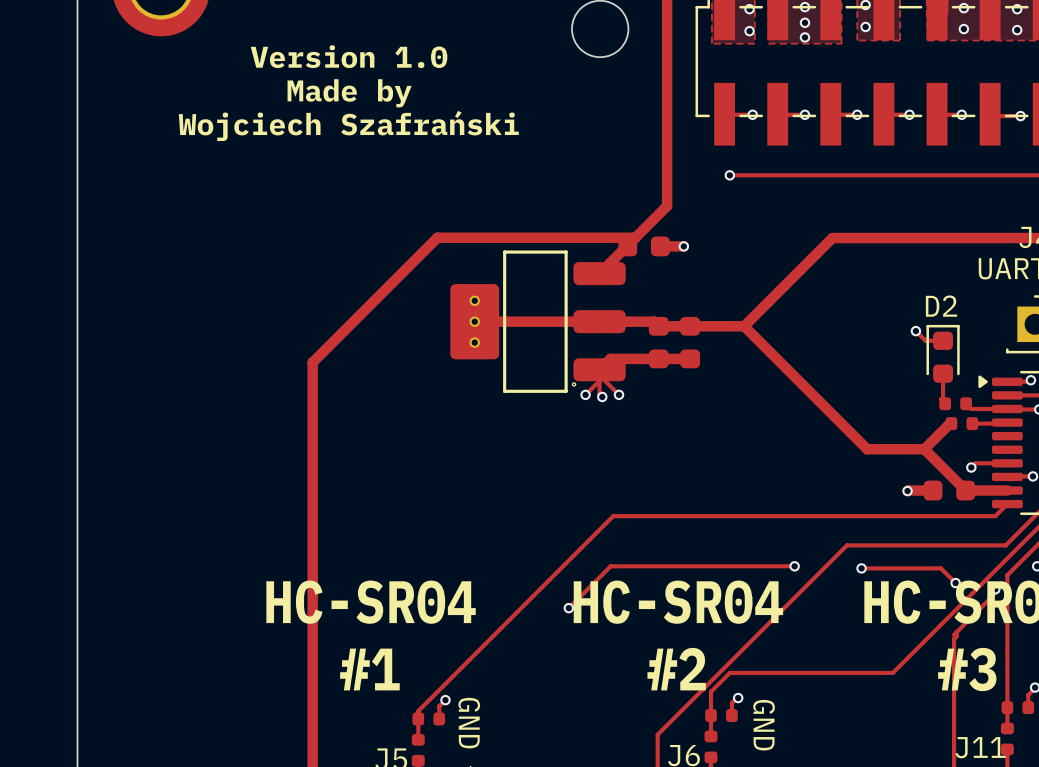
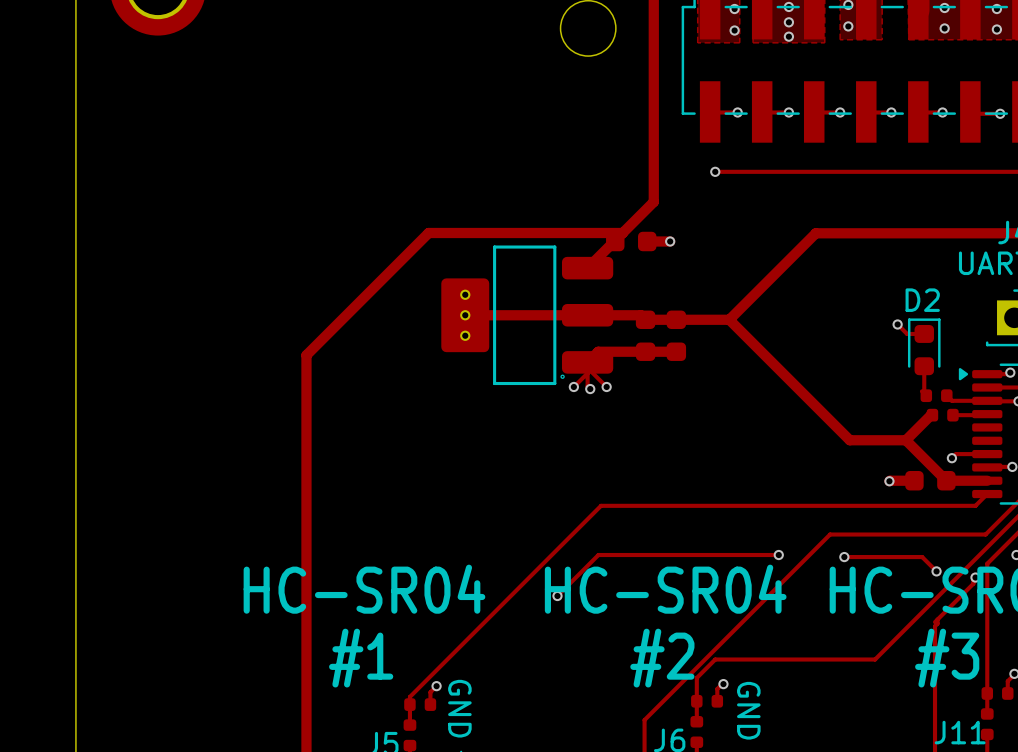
text: Version 1.0 (349, 56) -> none
text: Made by (349, 93) -> none
text: Wojciech Szafrański (348, 125) -> none

